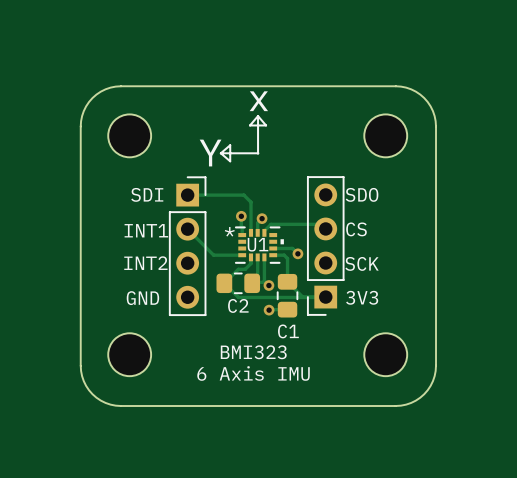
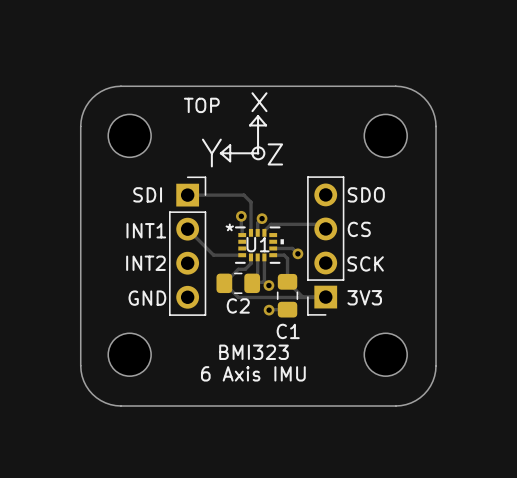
text: none -> TOP (201, 105)
drawing: none -> [251, 146, 266, 161]
text: none -> Z (275, 154)

